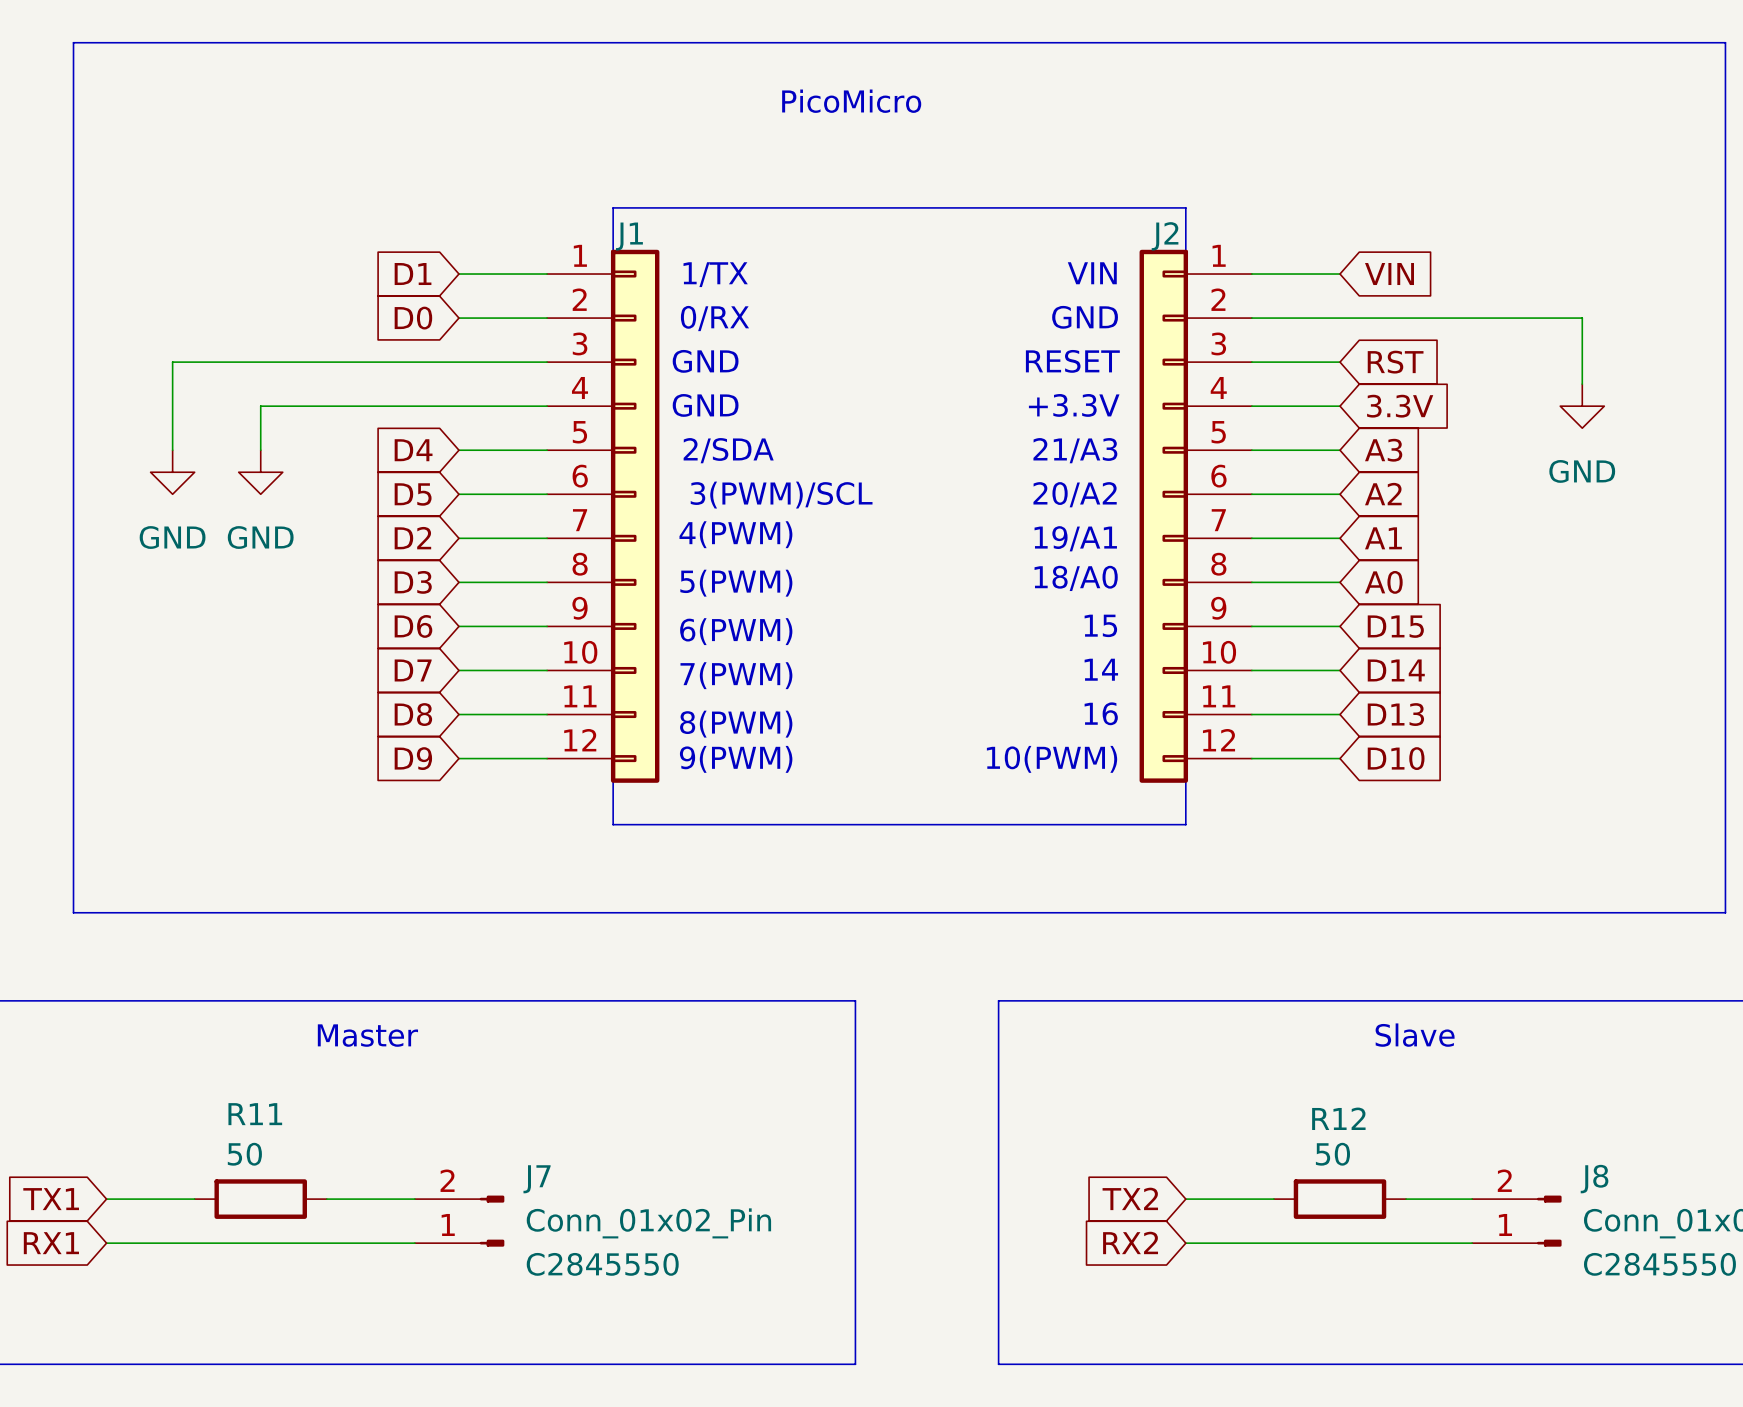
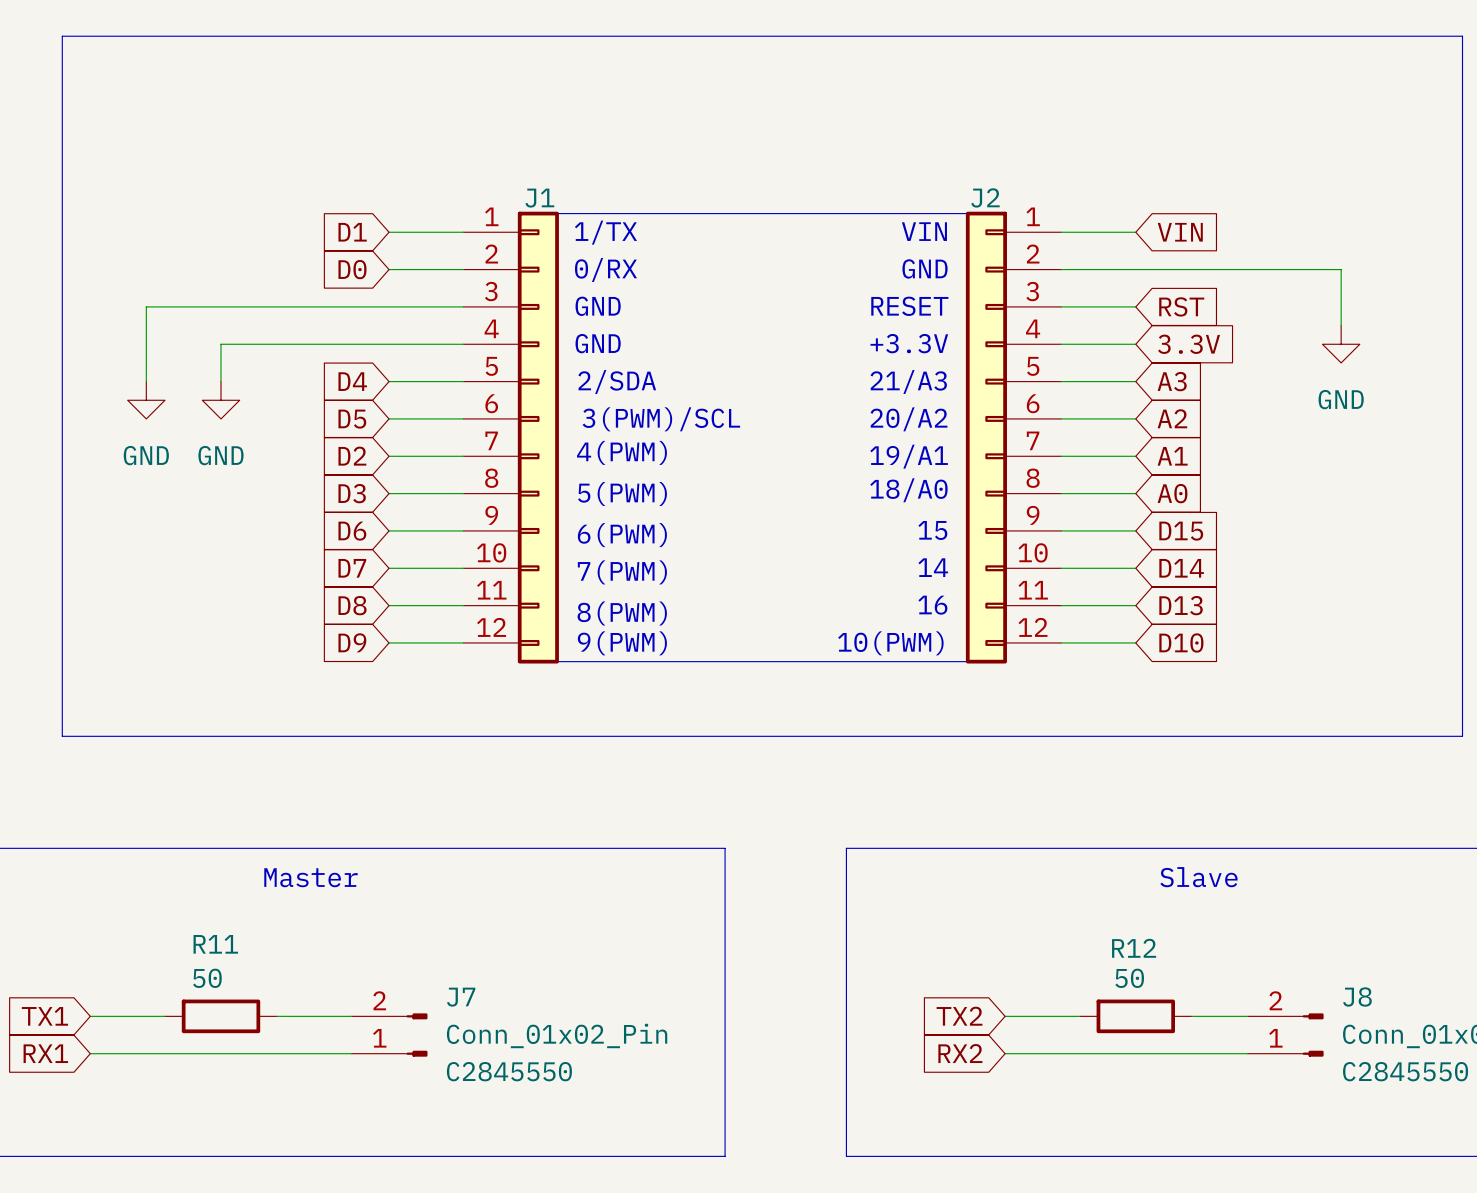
text: PicoMicro (851, 101) -> none
line: (613, 251) (613, 207) (1185, 207) (1185, 251) -> (519, 213) (1005, 213)
line: (613, 780) (613, 824) (1185, 824) (1185, 780) -> (519, 661) (1005, 661)
line: (73, 868) (73, 912) (1725, 912) (1725, 868) -> (62, 736) (1462, 736)

